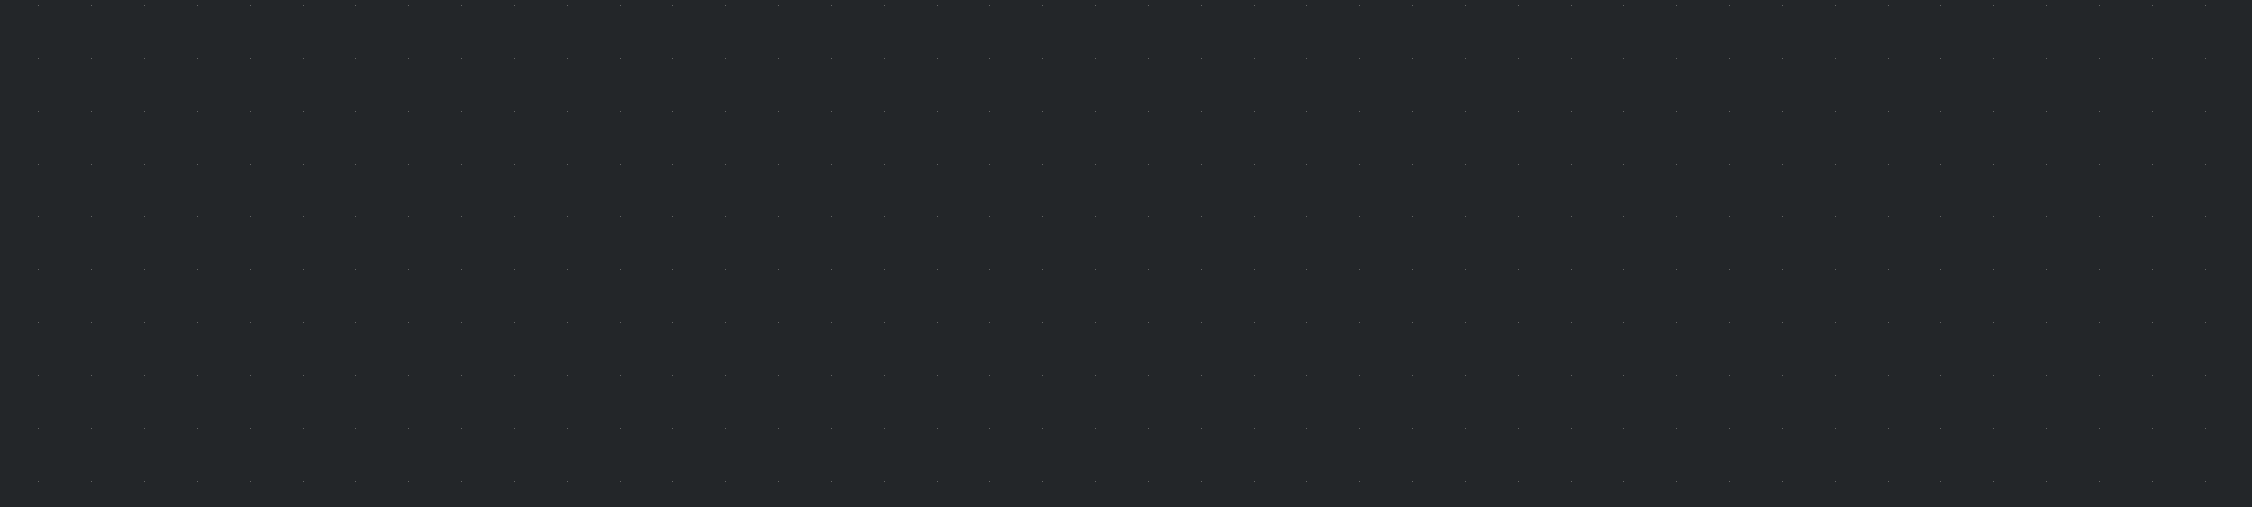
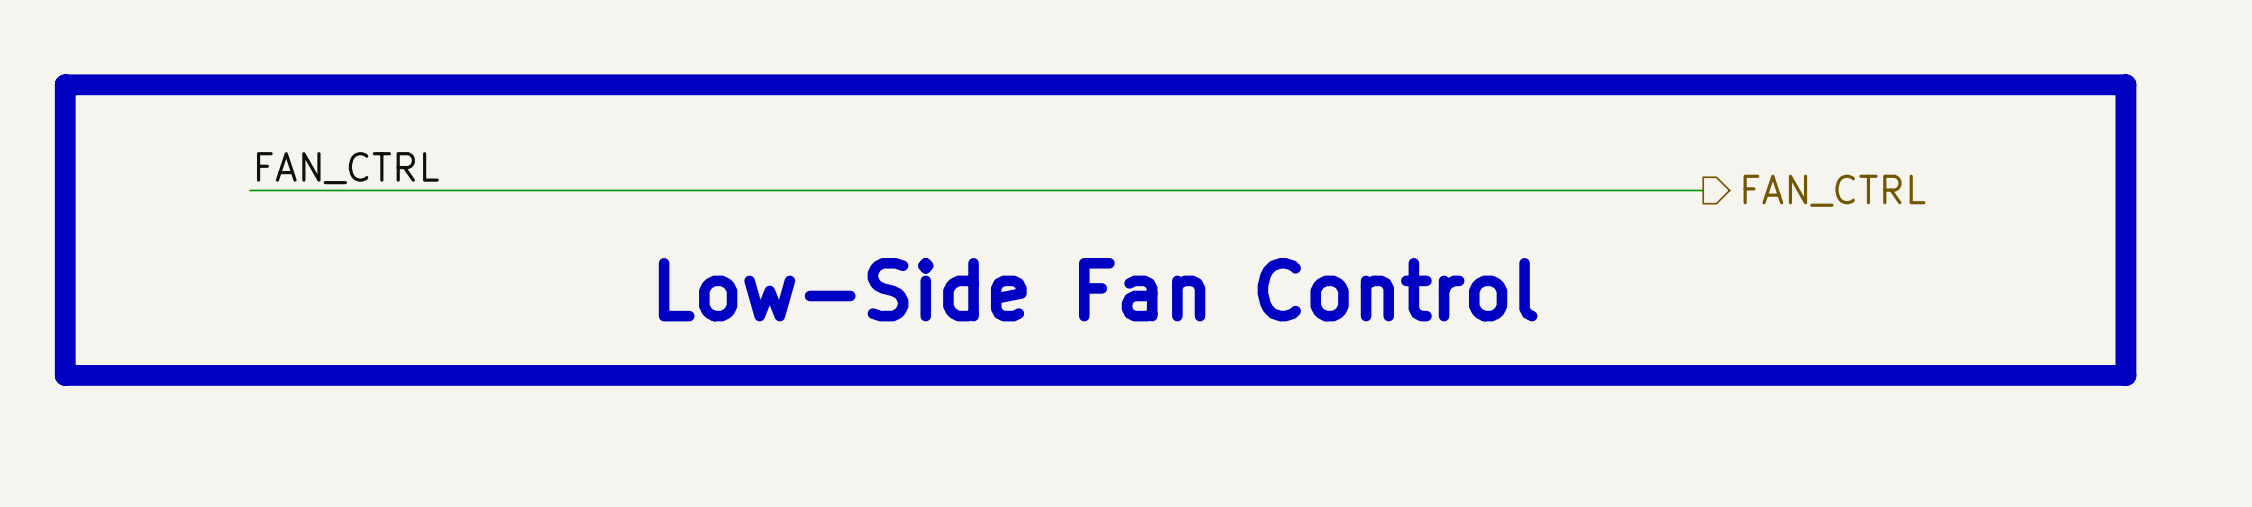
line: none -> (65, 84) (2125, 84) (2125, 375) (65, 375) (65, 84)
label: none -> FAN_CTRL (347, 168)
wire: none -> (250, 190) (1703, 190)
hierarchical label: none -> FAN_CTRL (1834, 190)
text: none -> Low-Side Fan Control (1098, 289)

